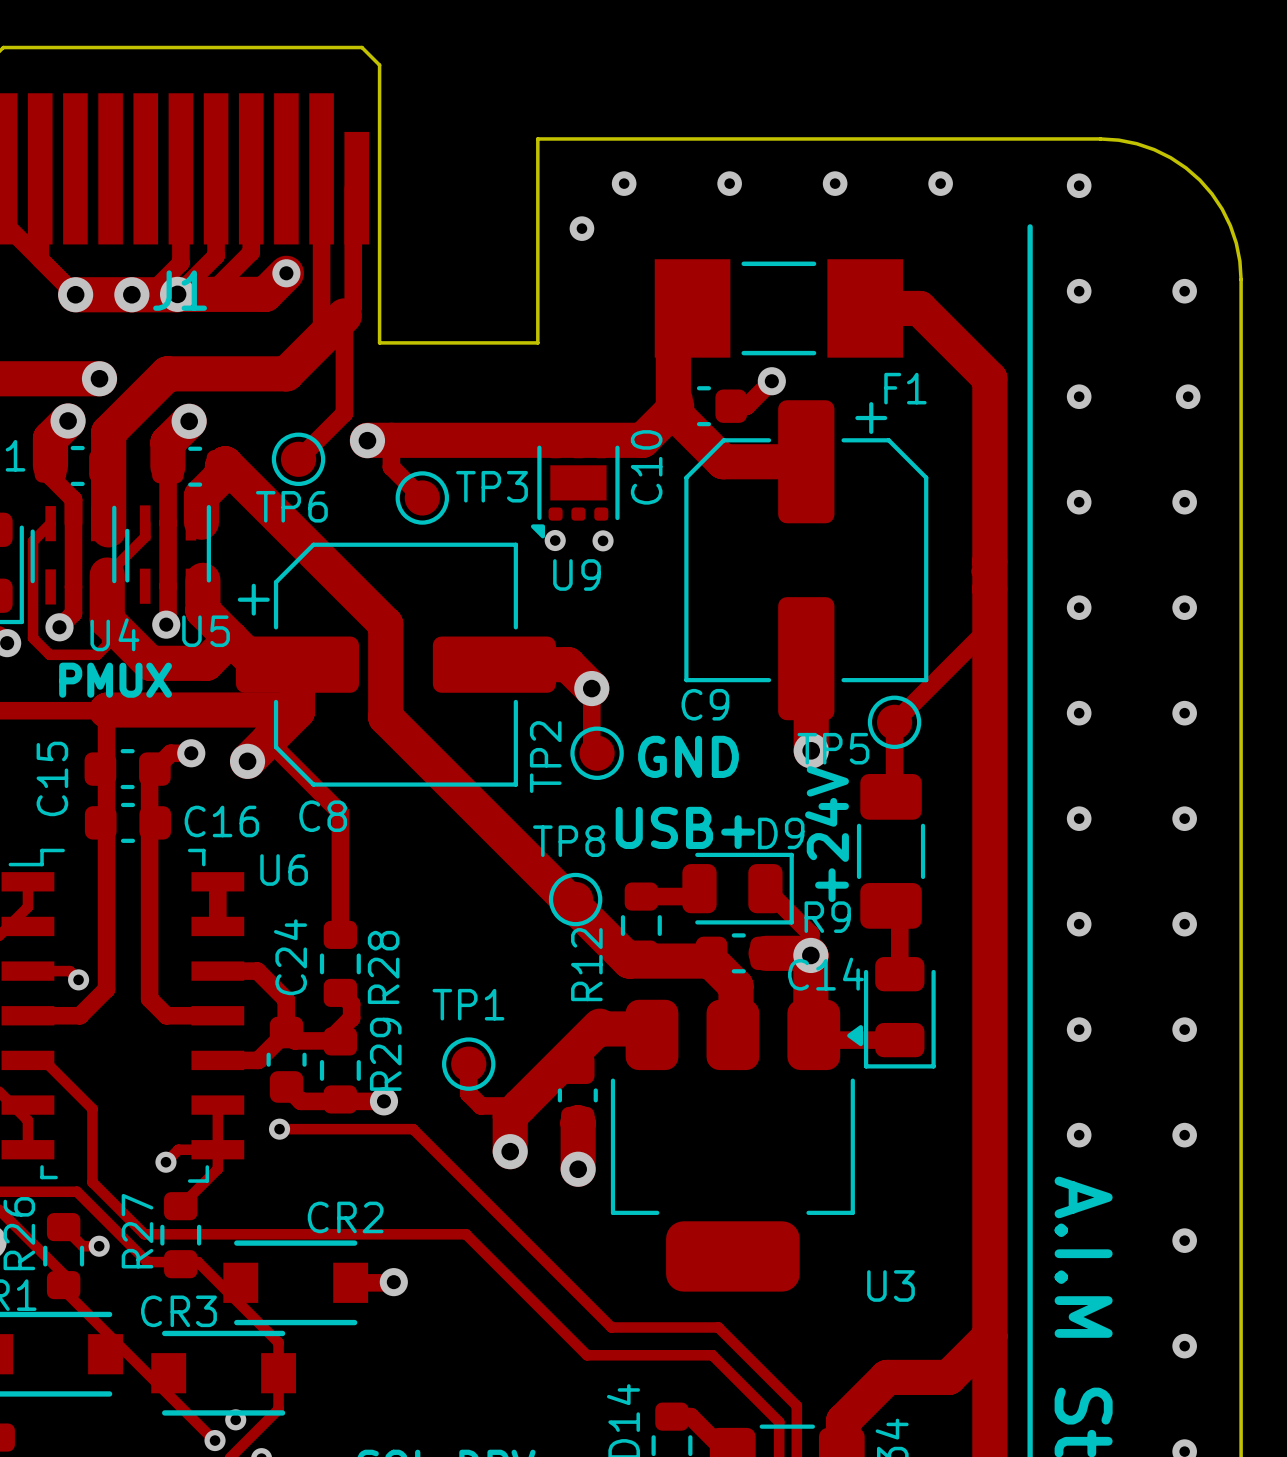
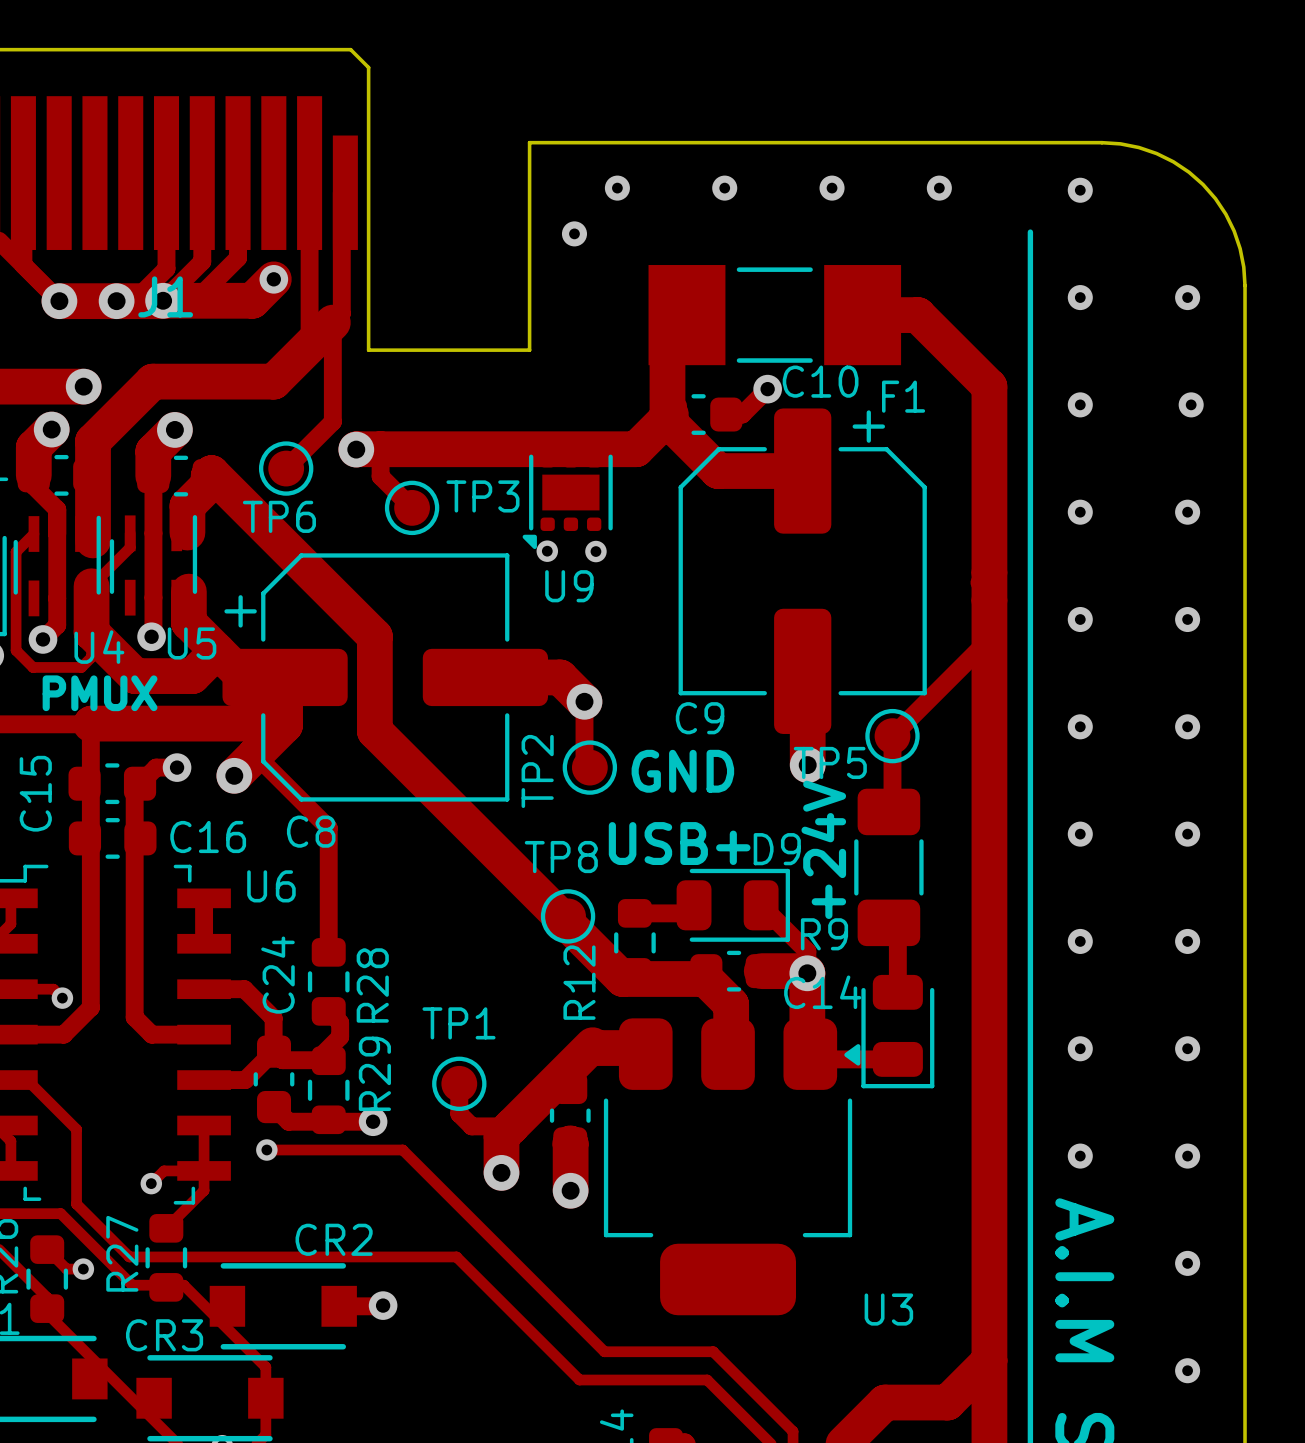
C10 name rotation: 0° (646, 467) -> 90° clockwise (820, 381)
C10 name position: C10 (646, 467) -> C10 (820, 381)

